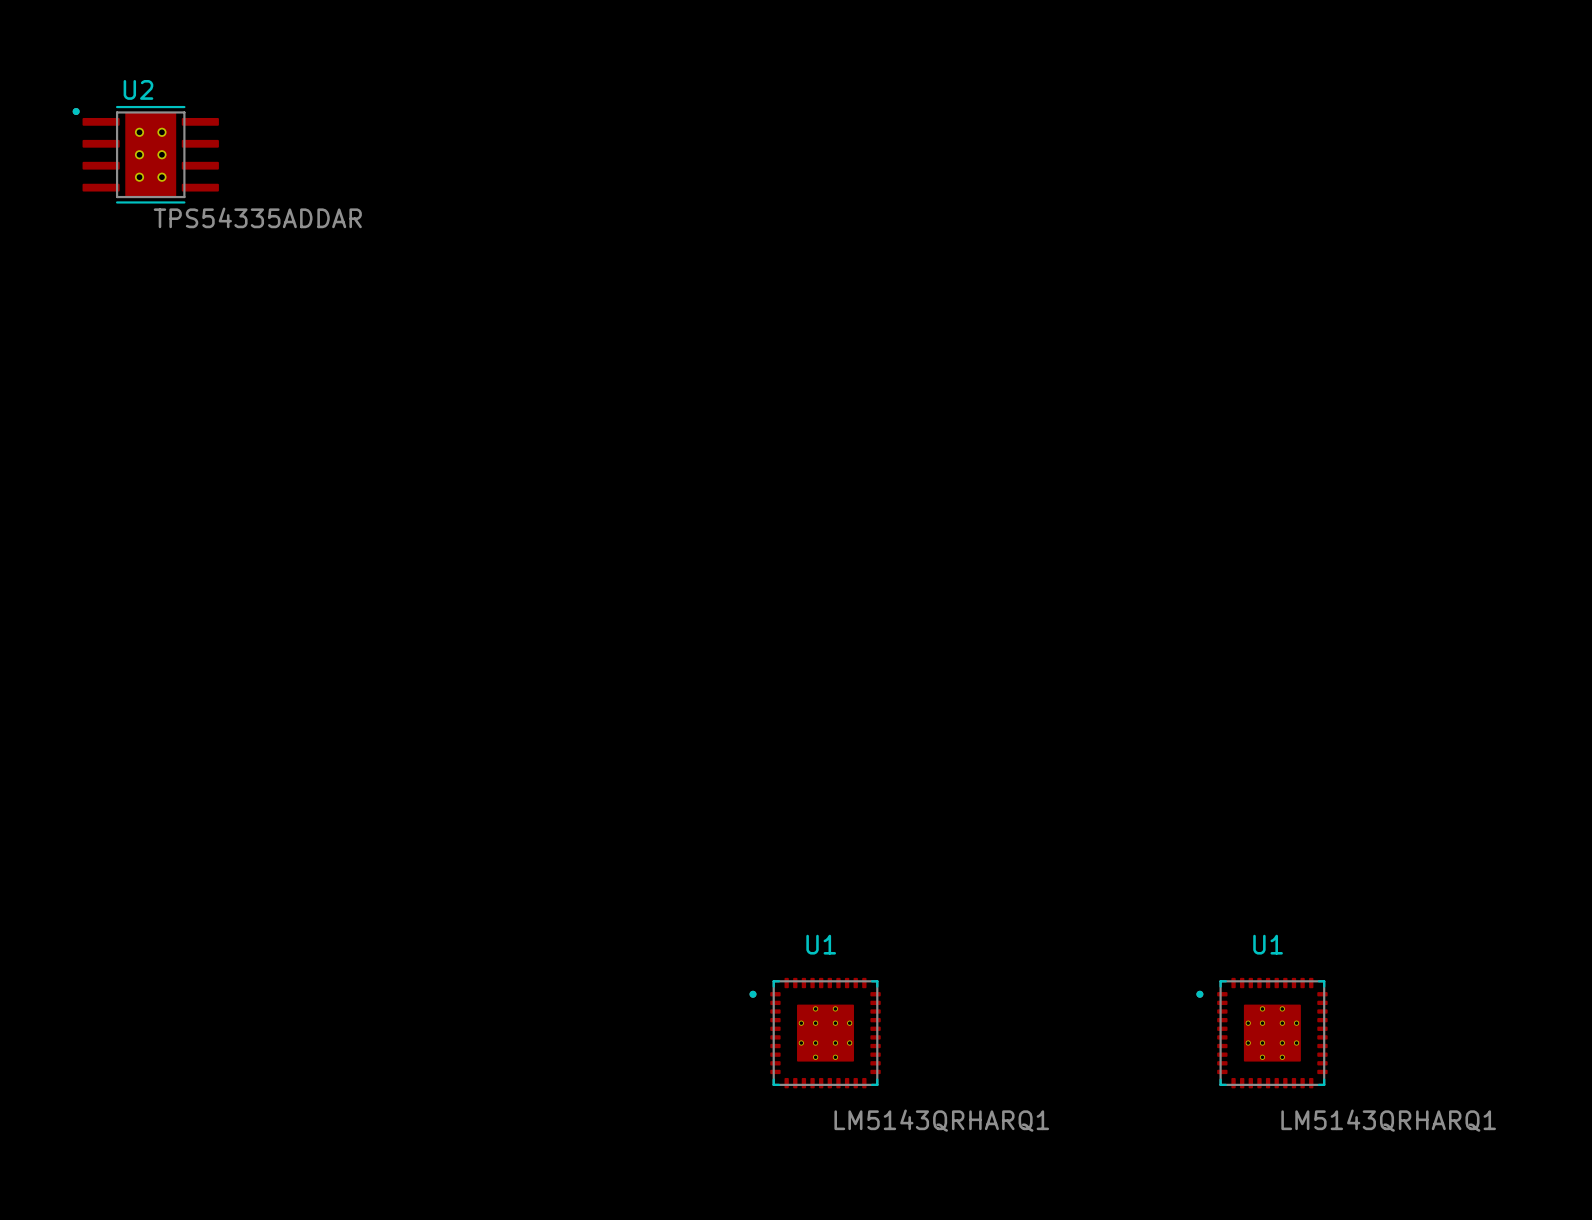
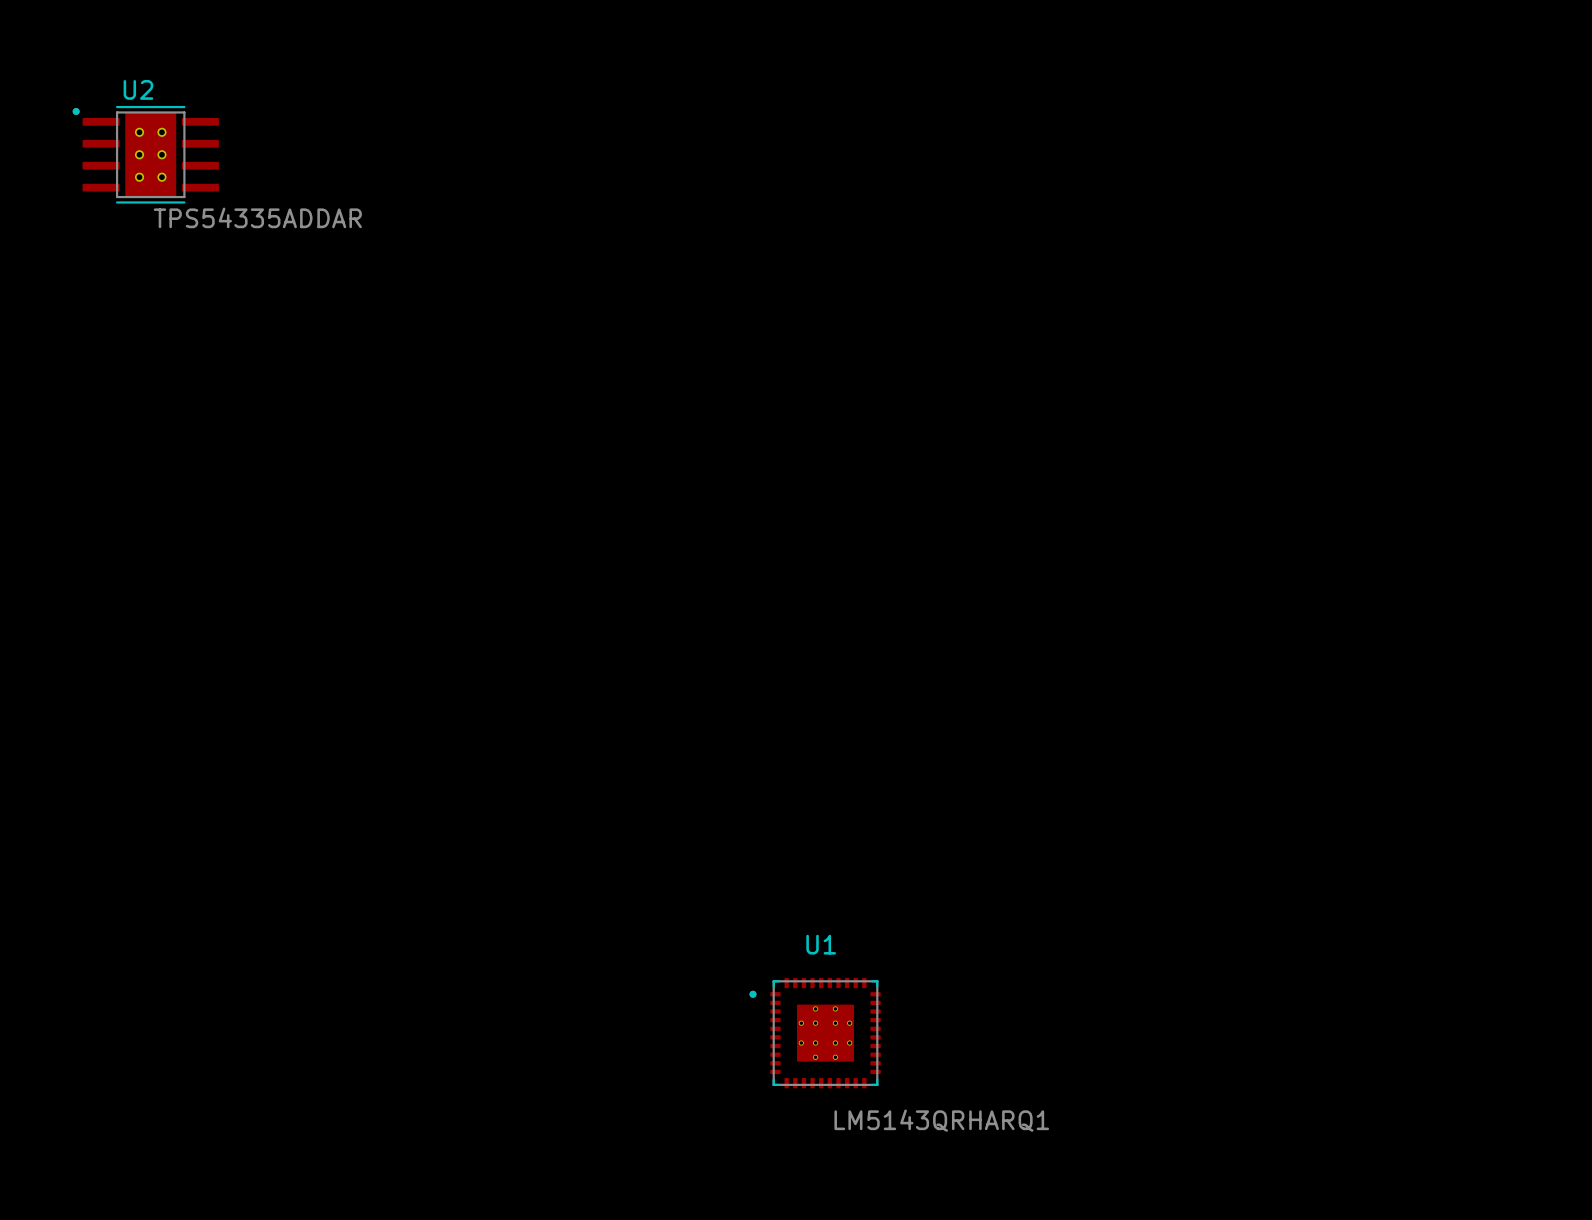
U1: LM5143QRHARQ1 (1262, 1033) -> none

